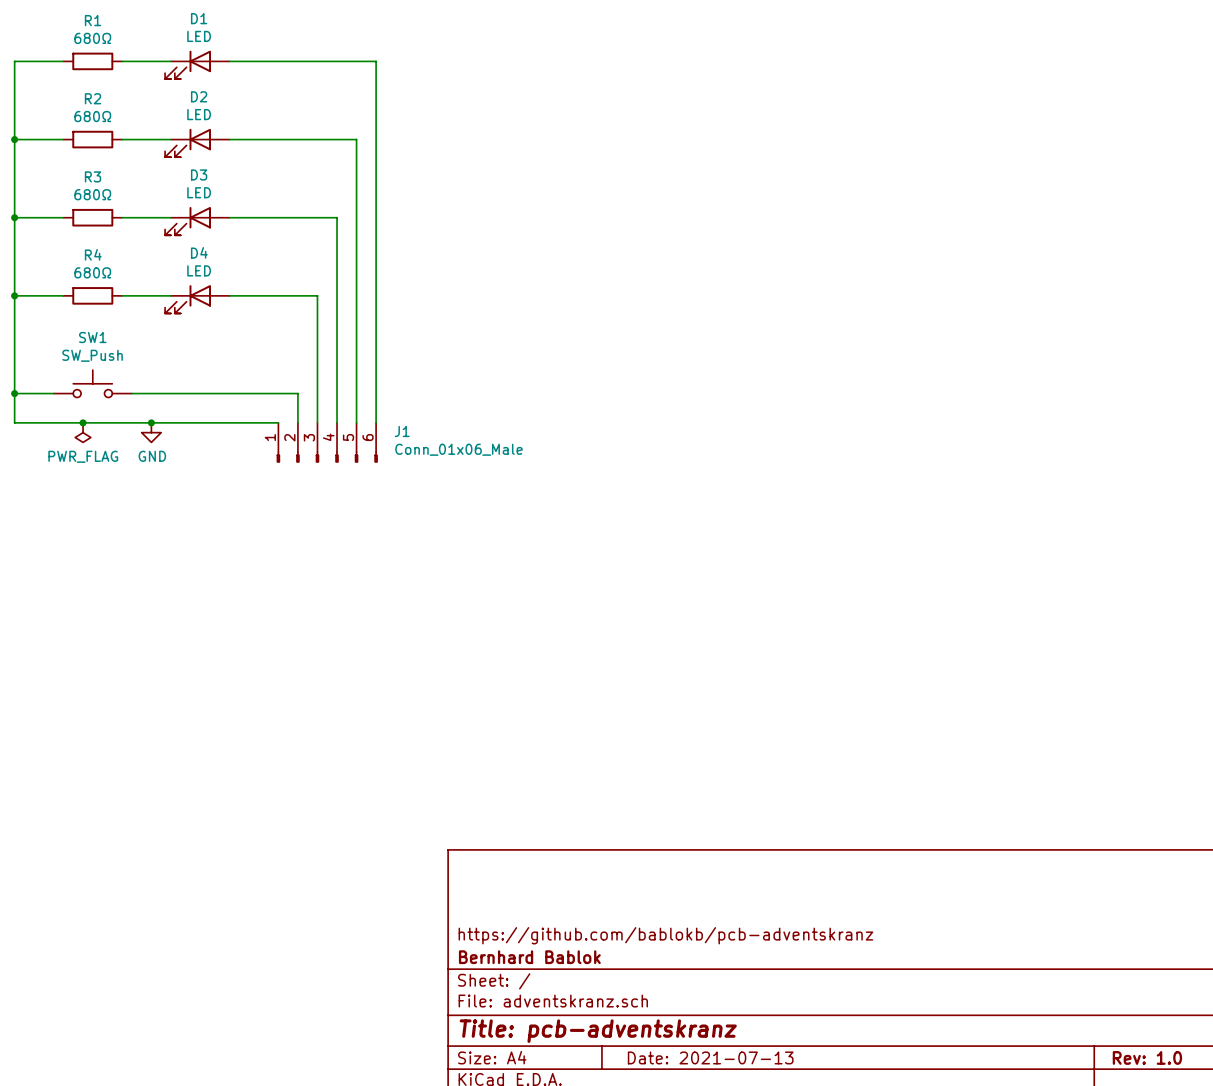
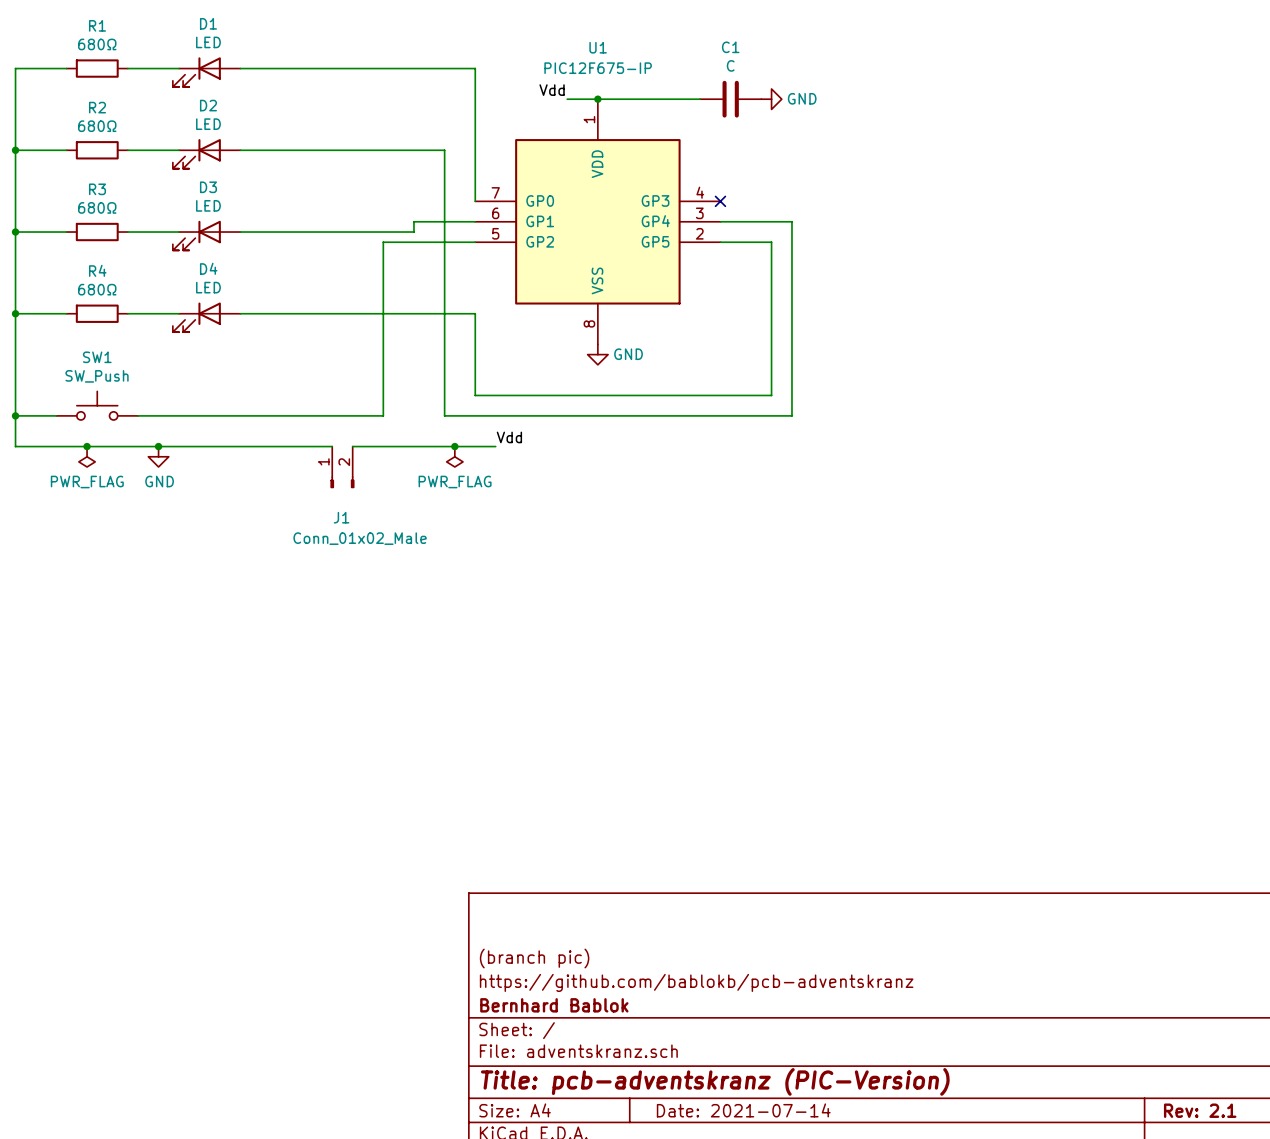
wire: (376, 61) (376, 422) -> (393, 68) (475, 68) (475, 201)
label: none -> Vdd (552, 90)
wire: none -> (567, 99) (700, 99)
junction: none -> (597, 99)
C1: none -> C (730, 99)
power symbol: none -> GND (771, 99)
wire: (356, 139) (356, 422) -> (373, 150) (444, 150) (444, 415) (791, 415) (791, 221) (720, 221)
no-connect mark: none -> (720, 201)
U1: none -> PIC12F675-IP (597, 221)
wire: (337, 217) (337, 422) -> (352, 232) (413, 232) (413, 221) (475, 221)
wire: none -> (720, 242) (771, 242) (771, 395) (475, 395) (475, 313) (332, 313)
wire: (317, 295) (317, 422) -> (291, 446) (332, 446)
power symbol: none -> GND (597, 354)
wire: (297, 393) (297, 422) -> (311, 415) (383, 415) (383, 242) (475, 242)
label: none -> Vdd (509, 437)
J1 symbol: [276, 422, 378, 463] -> [330, 446, 355, 489]
wire: none -> (352, 446) (495, 446)
junction: none -> (454, 446)
J1 name position: J1 (402, 431) -> J1 (341, 517)
power symbol: none -> PWR_FLAG (454, 456)
J1 value: Conn_01x06_Male (458, 449) -> Conn_01x02_Male (360, 538)
title block: none -> (branch pic) (534, 958)
title block: Title: pcb-adventskranz (598, 1031) -> Title: pcb-adventskranz (PIC-Version) (715, 1081)
title block: Date: 2021-07-13 (710, 1057) -> Date: 2021-07-14 (743, 1110)
title block: Rev: 1.0 (1147, 1057) -> Rev: 2.1 (1200, 1110)

